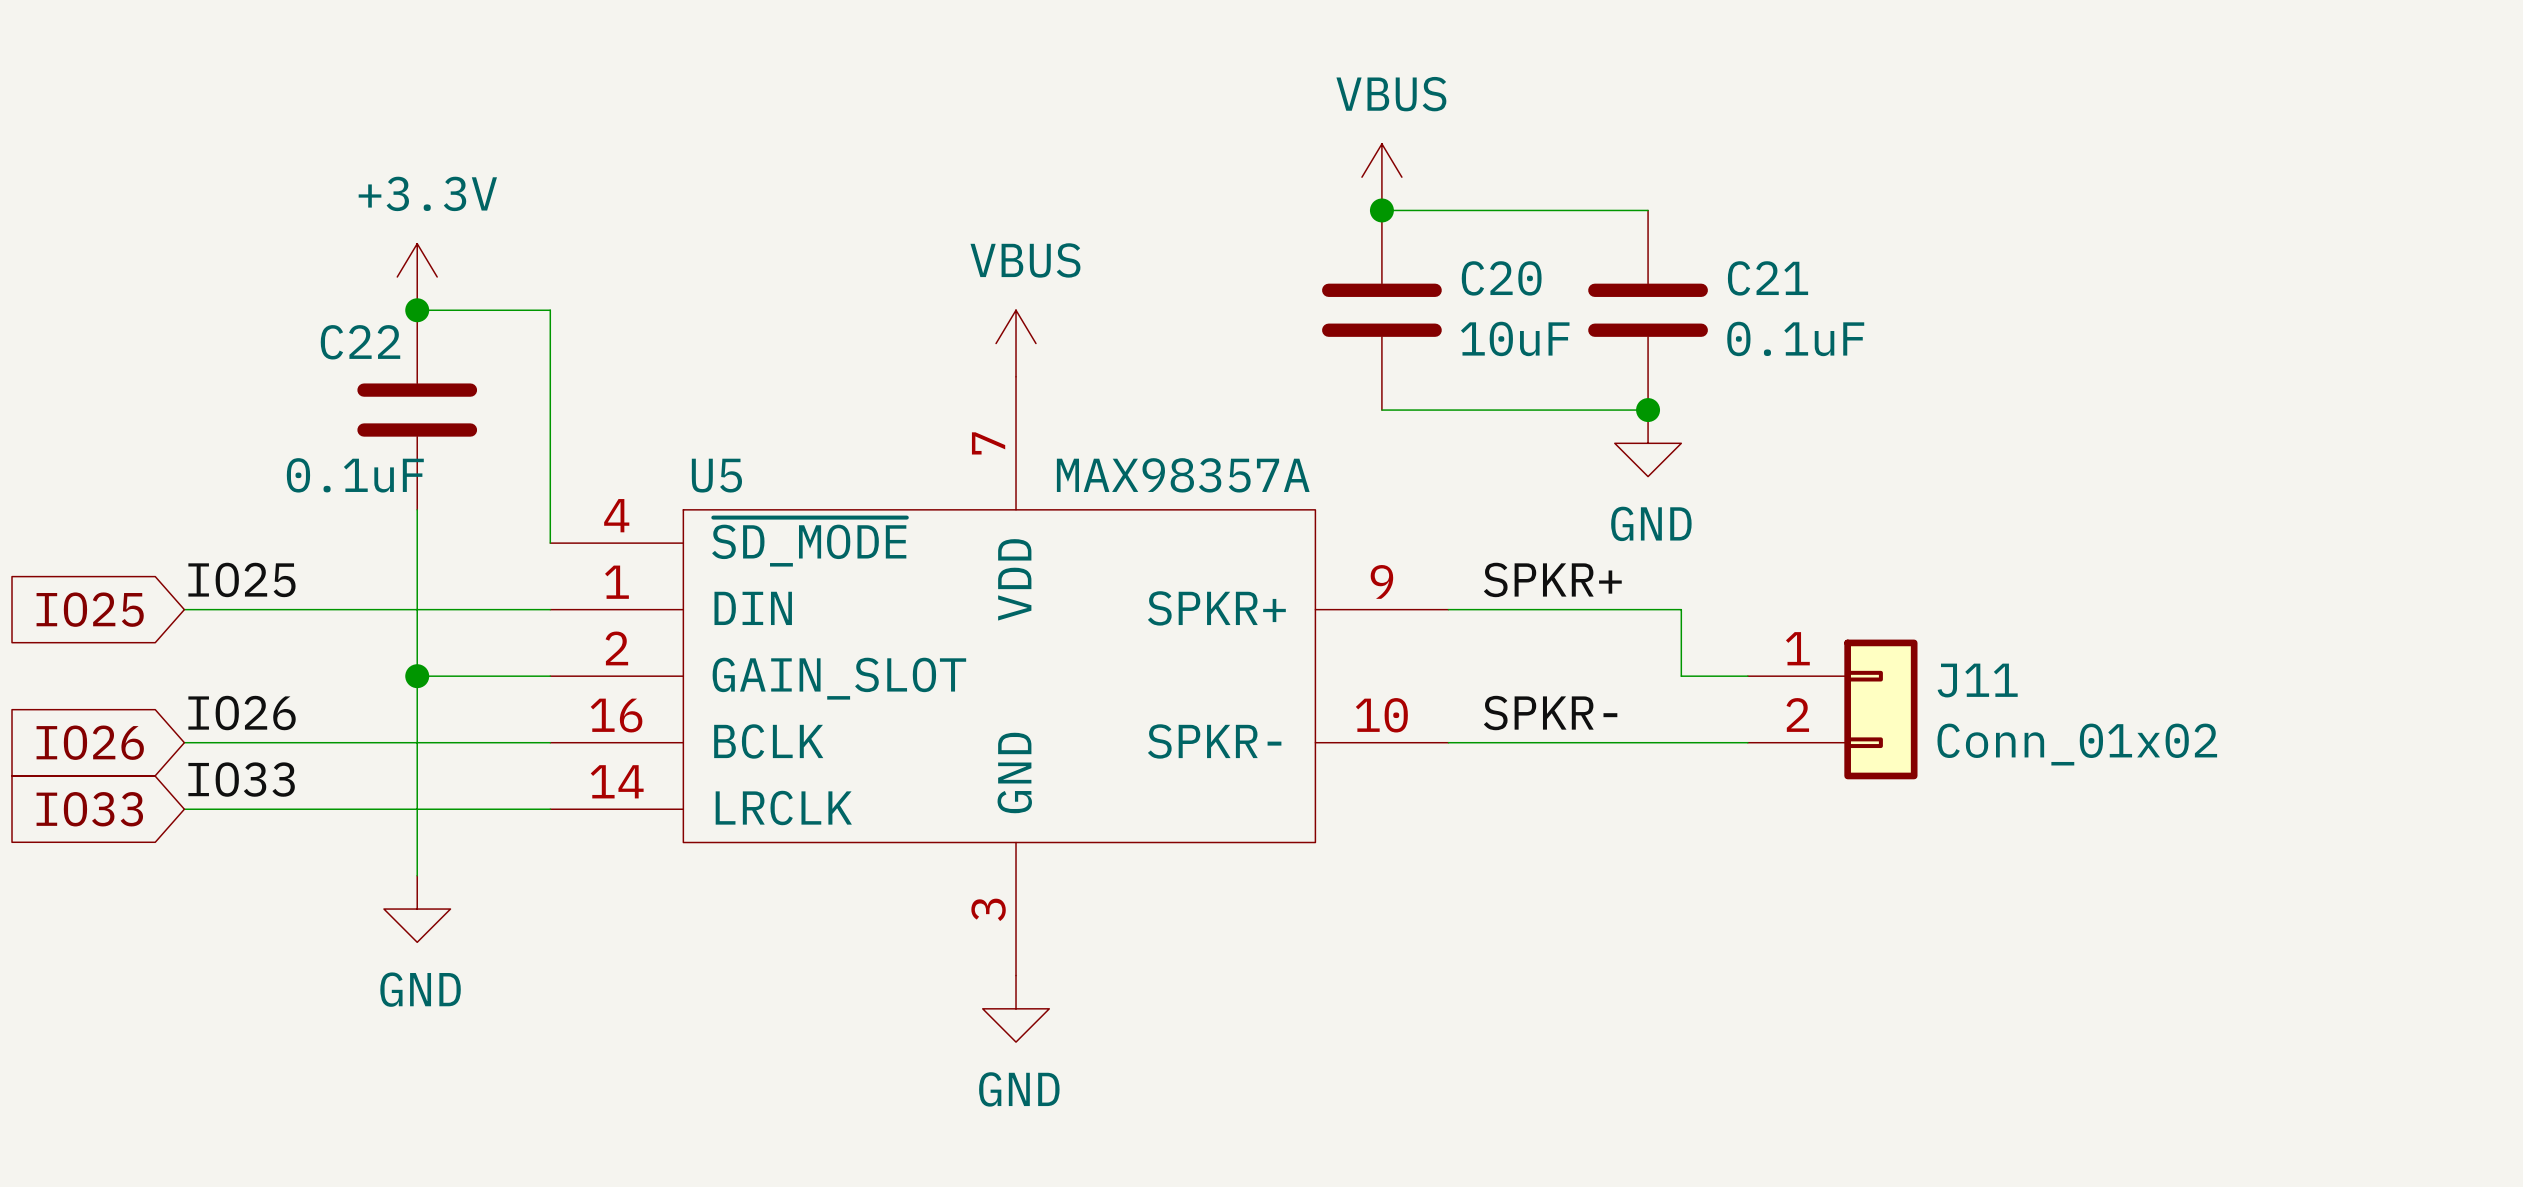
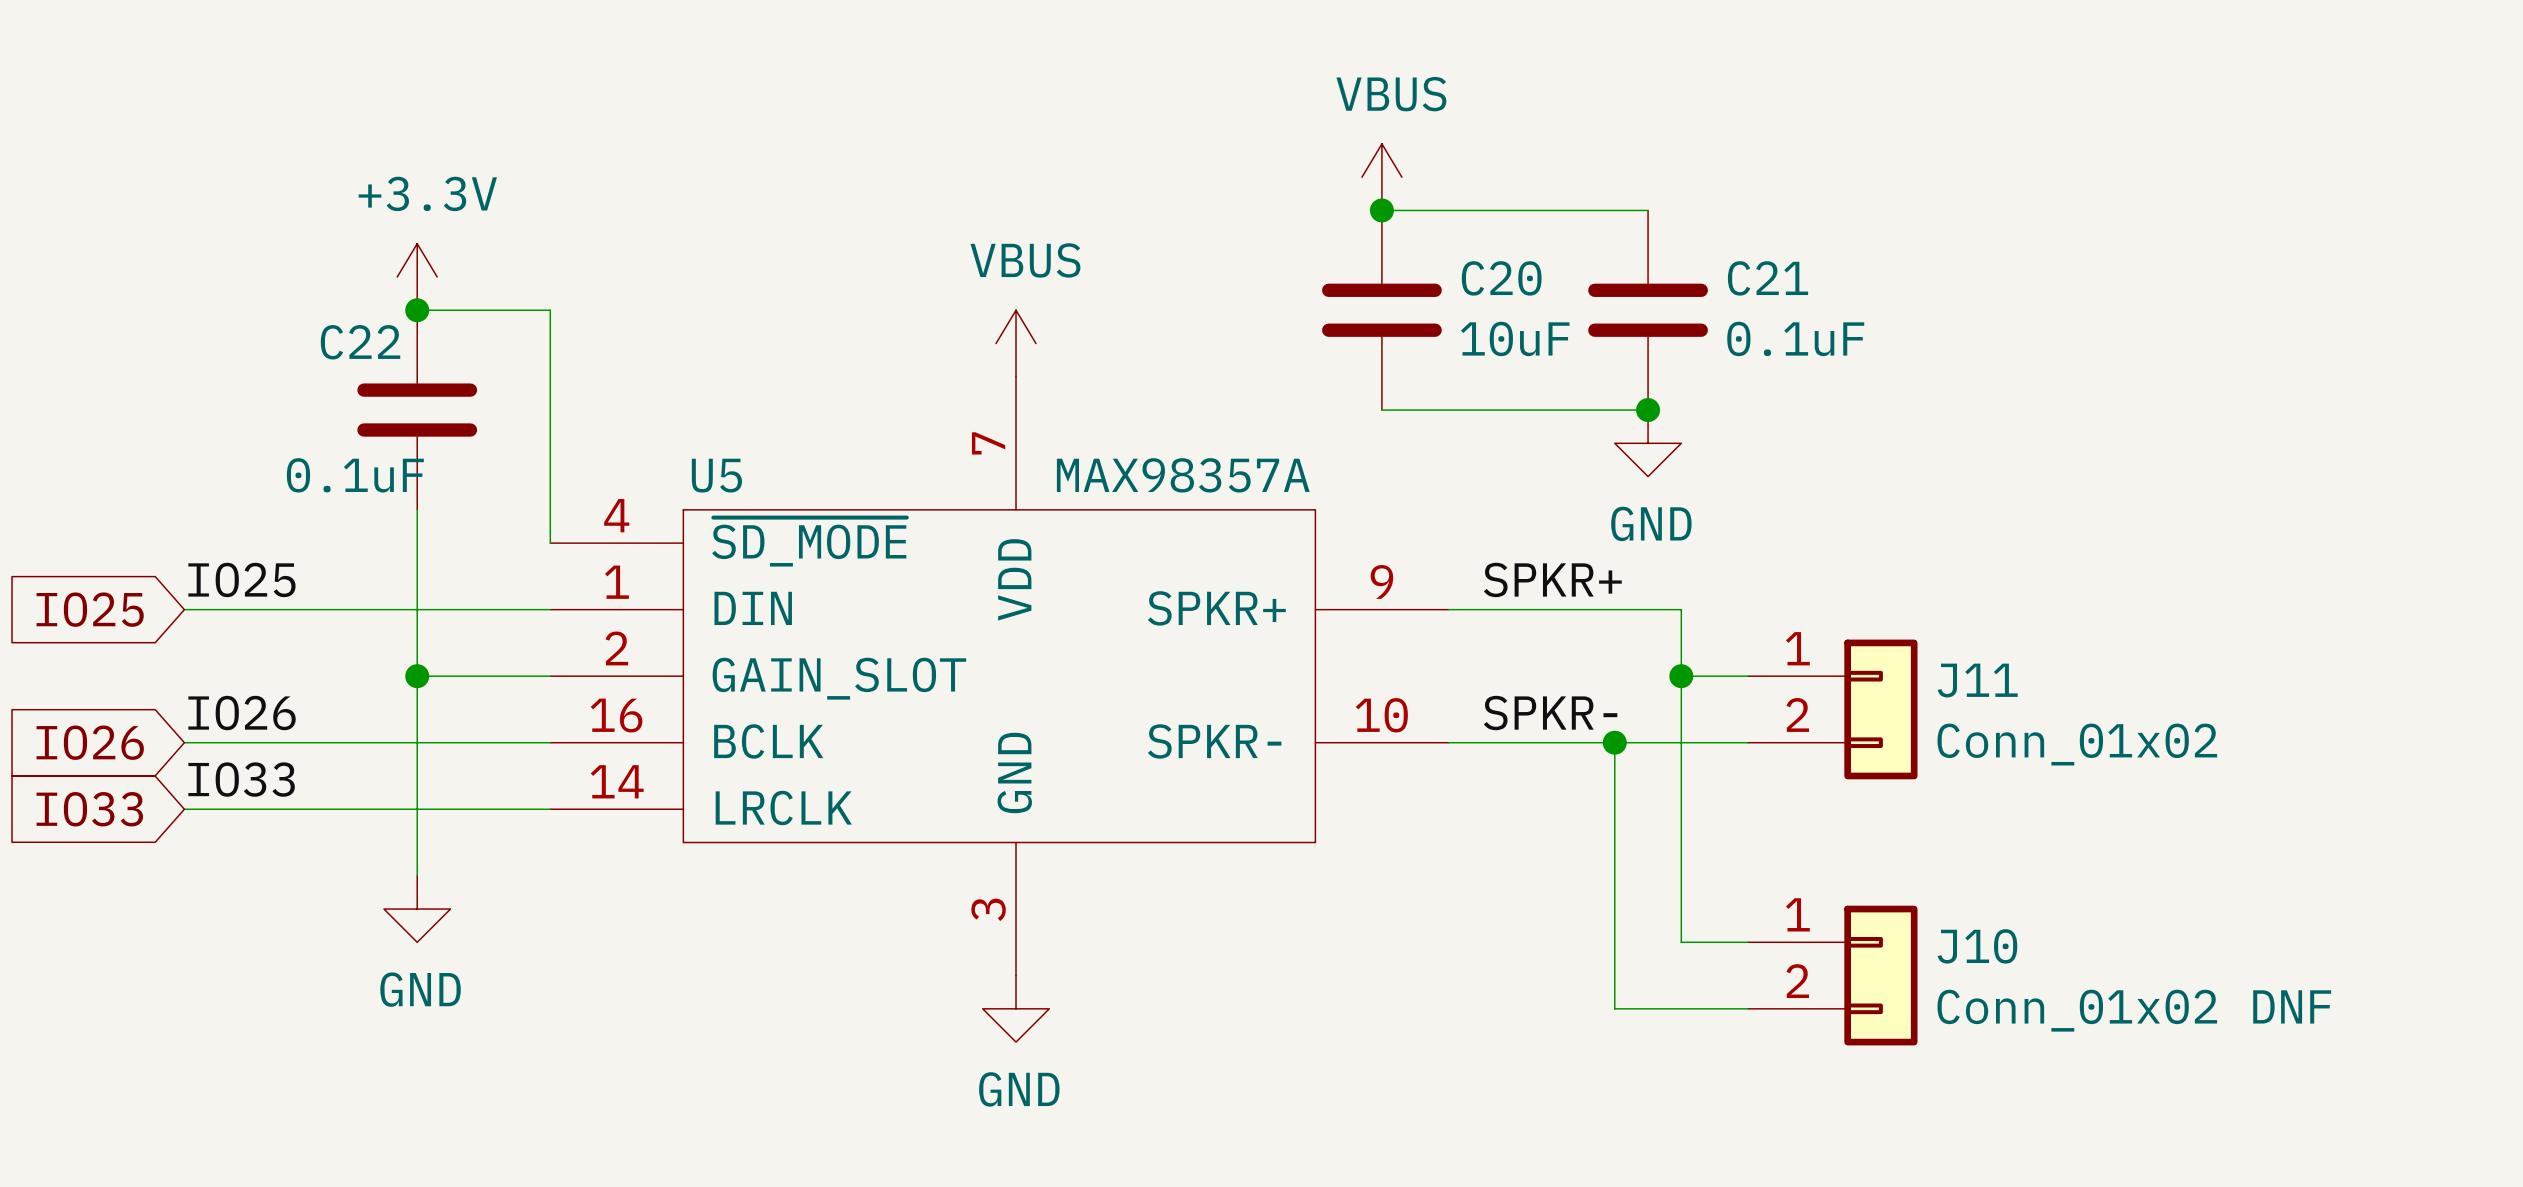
wire: none -> (1681, 676) (1681, 942) (1747, 942)
junction: none -> (1681, 676)
wire: none -> (1614, 742) (1614, 1008) (1747, 1008)
junction: none -> (1614, 742)
J10: none -> Conn_01x02 DNF (1832, 975)

